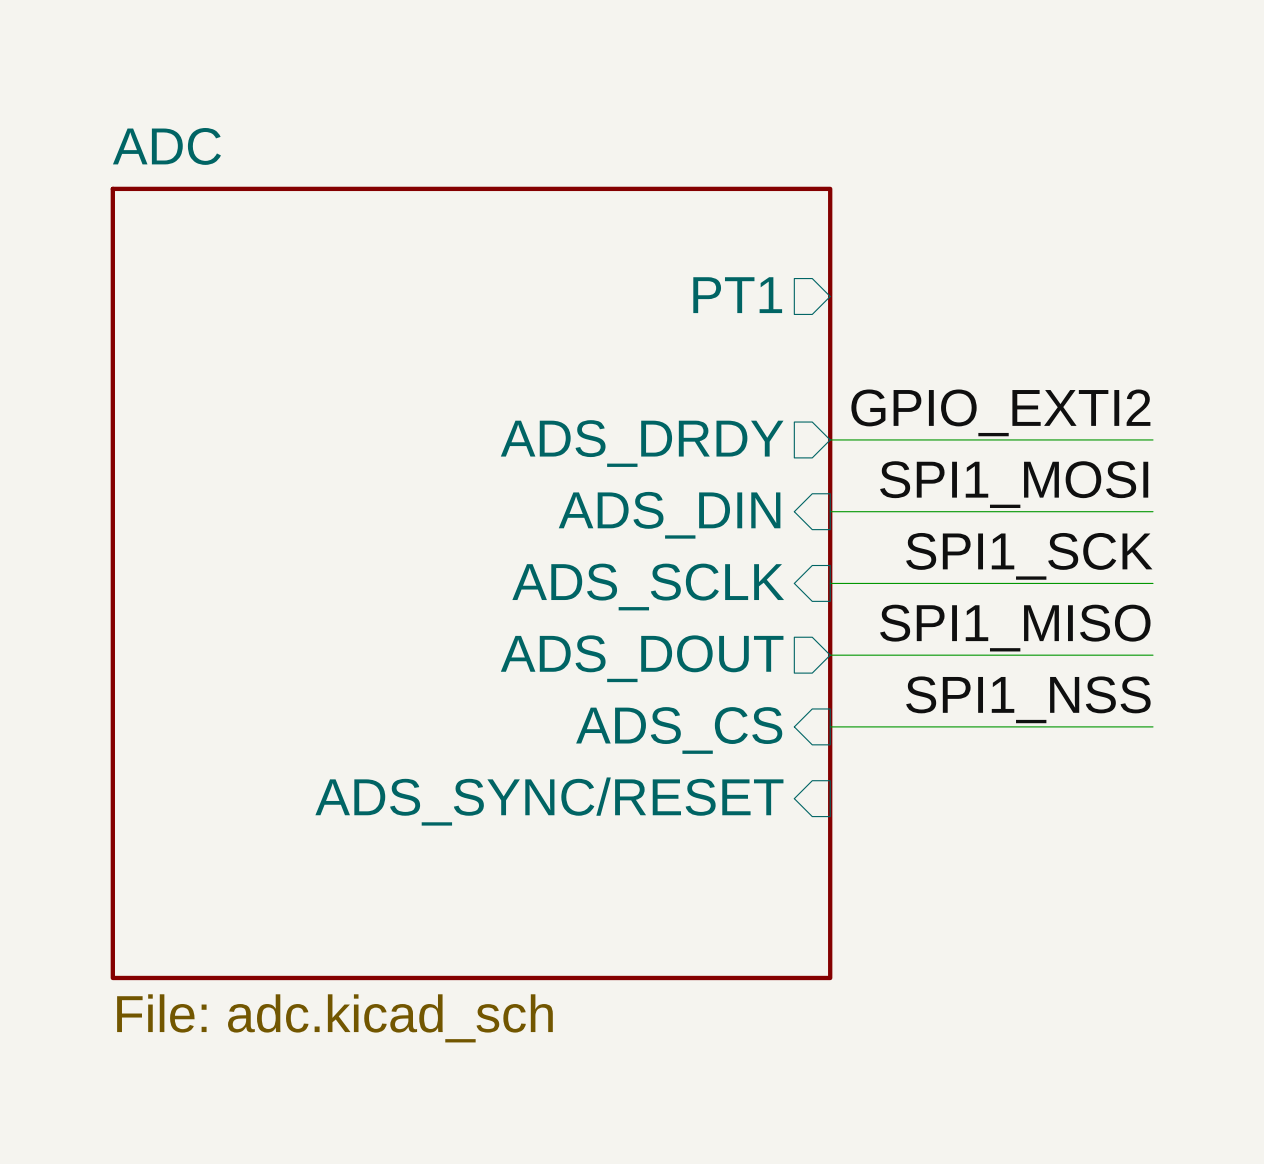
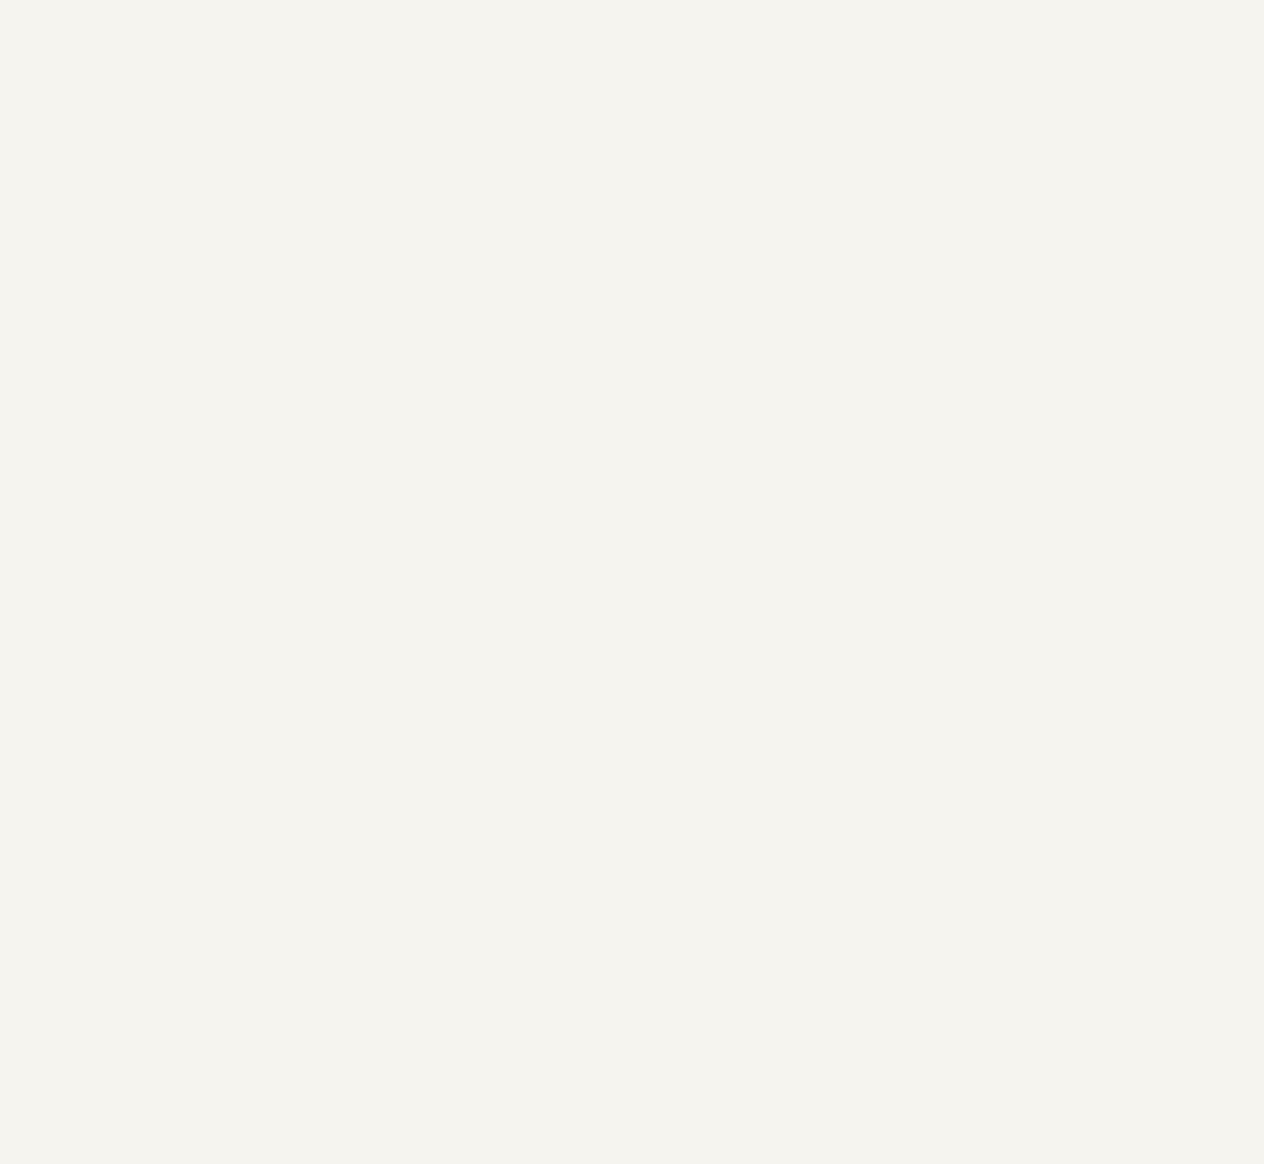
sheet pin: PT1 (737, 295) -> none
label: GPIO_EXTI2 (1000, 412) -> none
wire: (830, 439) (1153, 439) -> none
sheet pin: ADS_DRDY (642, 443) -> none
label: SPI1_MOSI (1014, 484) -> none
wire: (830, 511) (1153, 511) -> none
sheet pin: ADS_DIN (669, 515) -> none
label: SPI1_SCK (1029, 556) -> none
sheet ADC: File: adc.kicad_sch (471, 583) -> none
wire: (830, 583) (1153, 583) -> none
sheet pin: ADS_SCLK (648, 587) -> none
label: SPI1_MISO (1015, 628) -> none
wire: (830, 655) (1153, 655) -> none
sheet pin: ADS_DOUT (642, 658) -> none
label: SPI1_NSS (1028, 699) -> none
wire: (830, 726) (1153, 726) -> none
sheet pin: ADS_CS (679, 730) -> none
sheet pin: ADS_SYNC/RESET (549, 801) -> none

